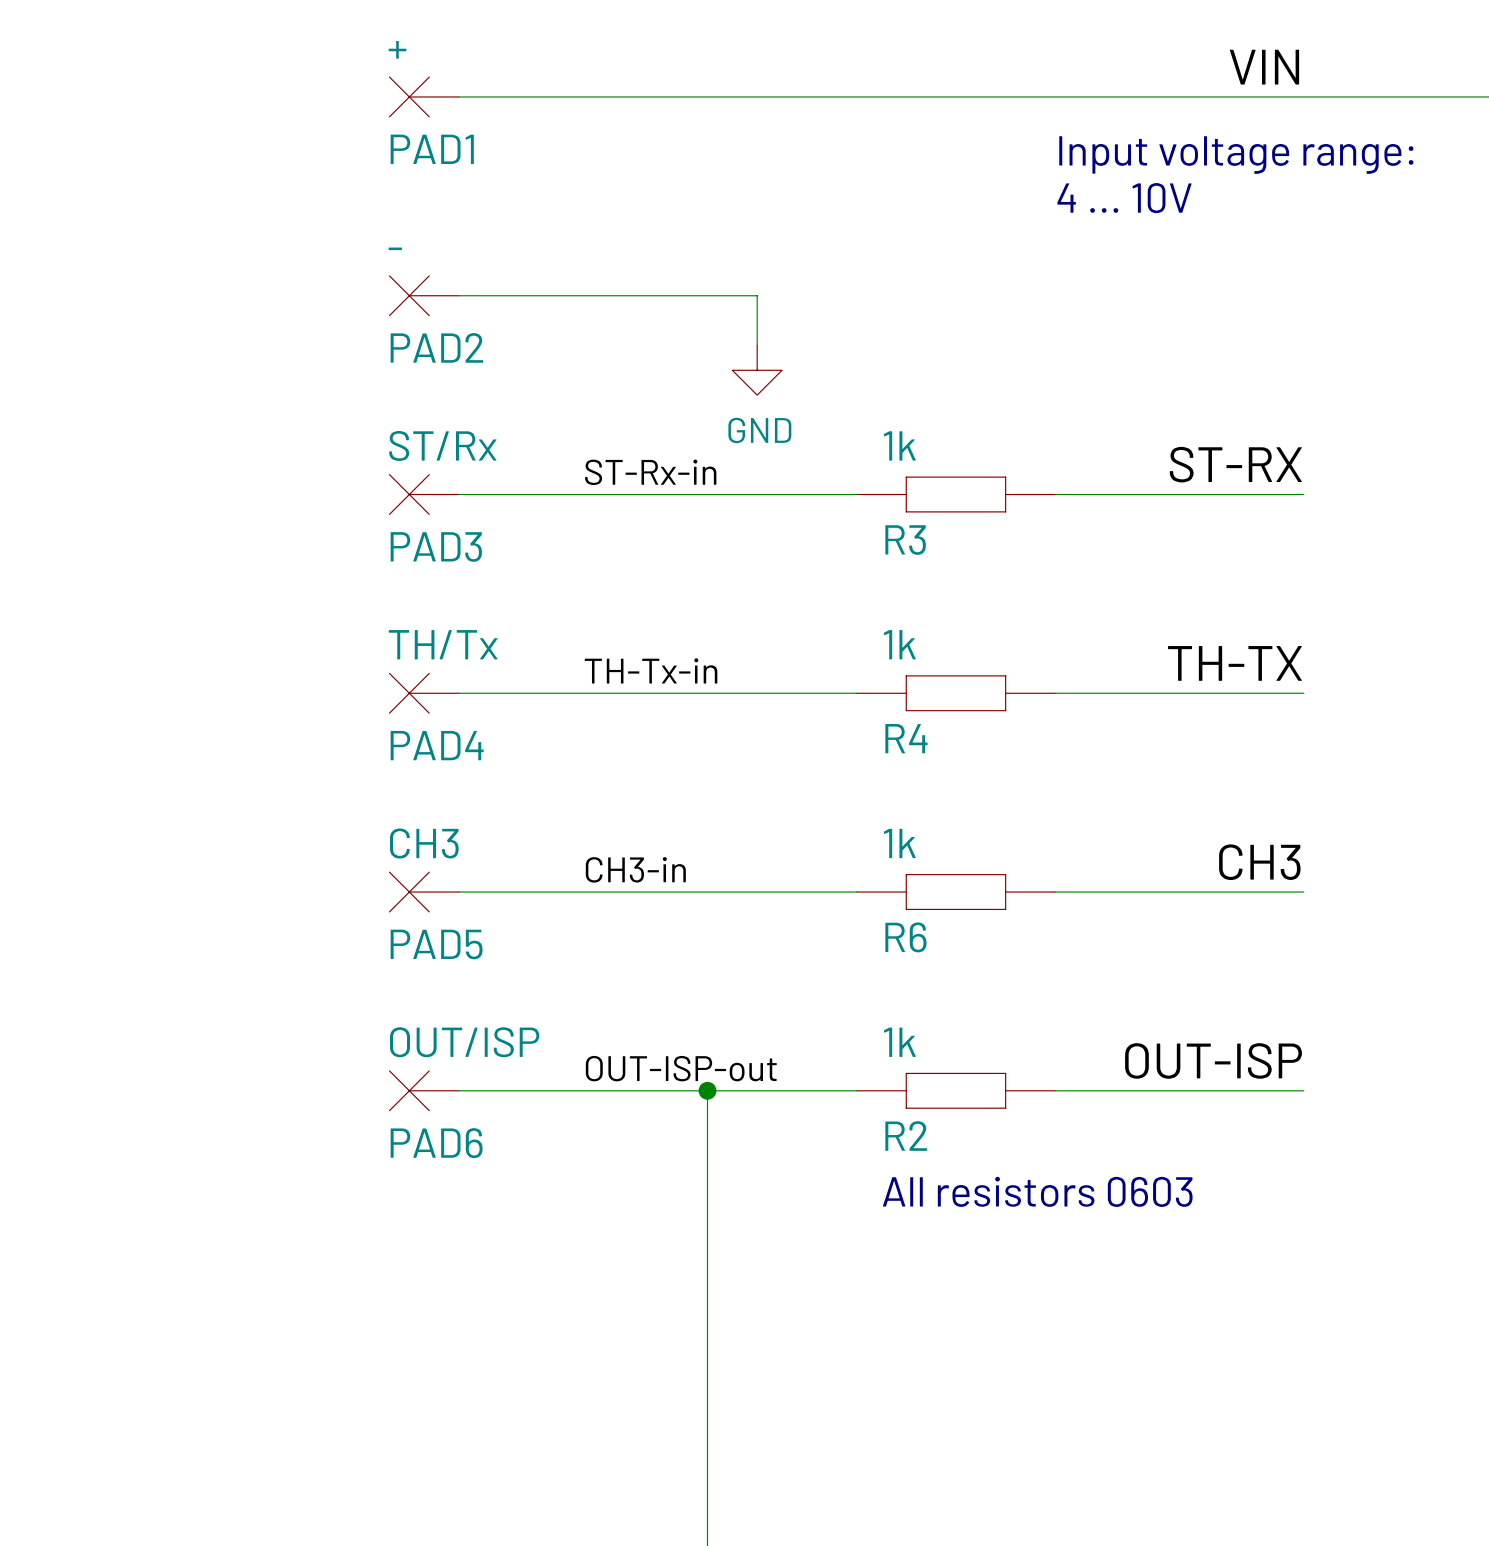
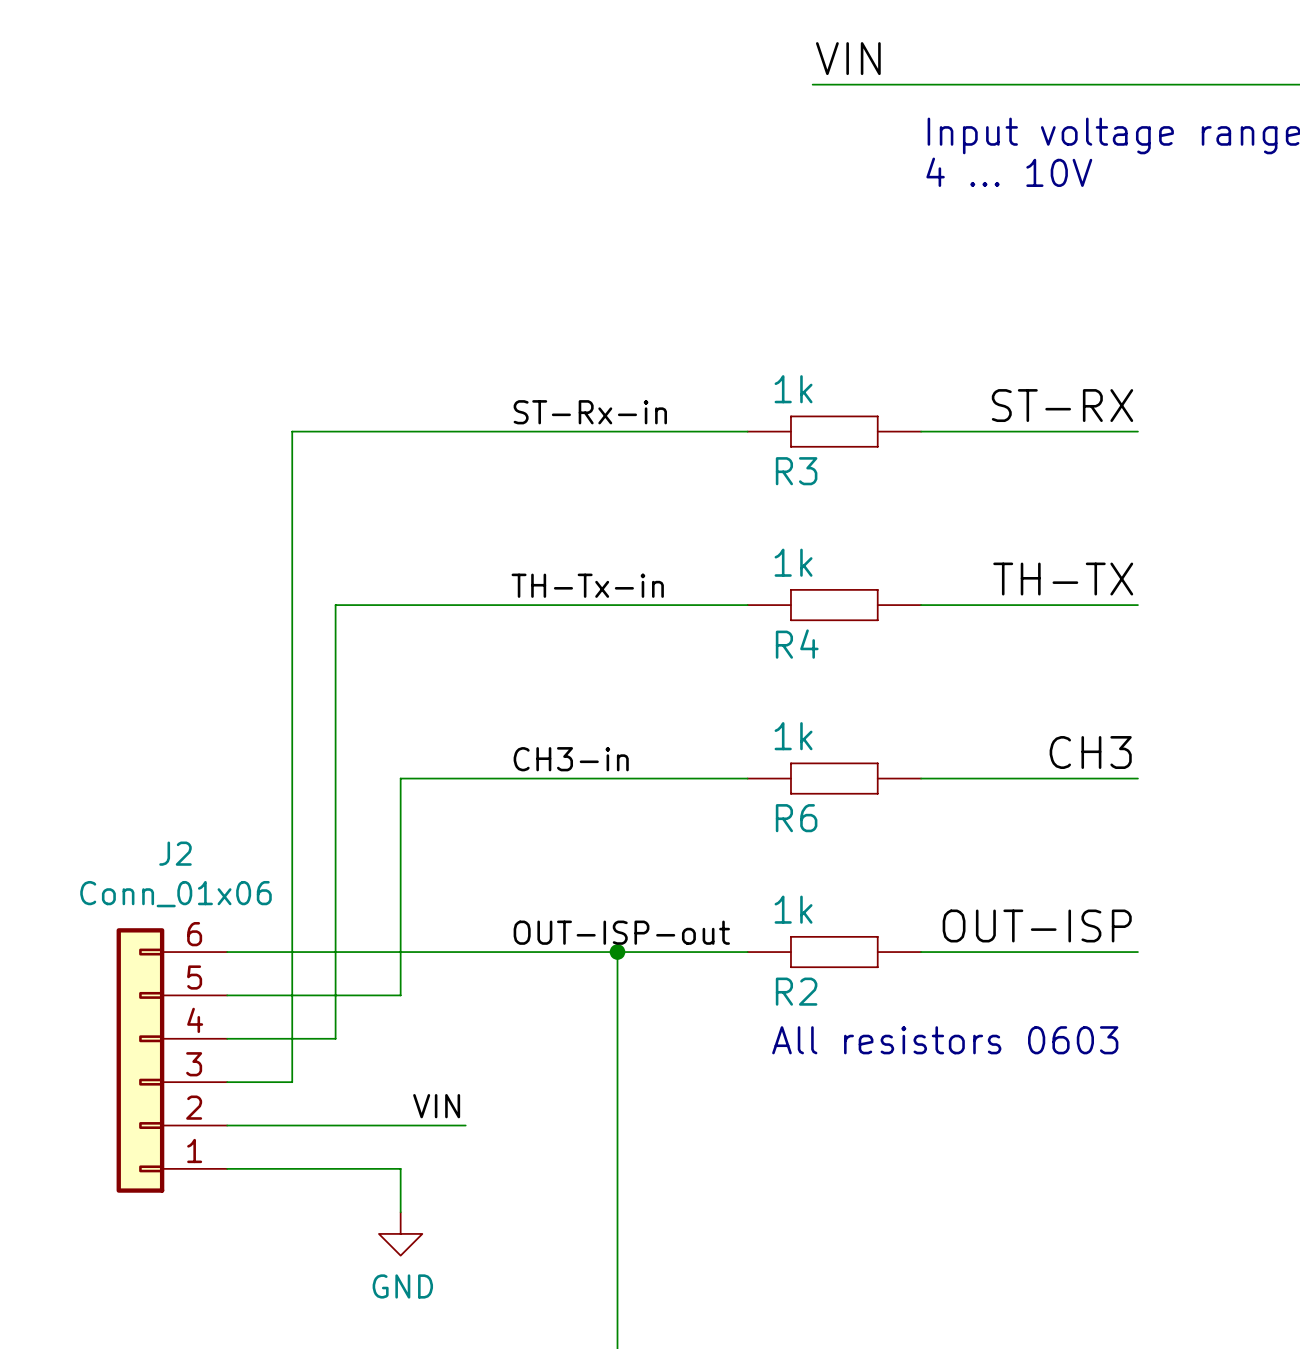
label position: VIN (1264, 67) -> VIN (848, 58)
PAD1: + (424, 96) -> none
wire: (459, 96) (931, 96) -> none
PAD2: - (424, 295) -> none
wire: (459, 295) (757, 295) (757, 345) -> none
power symbol: GND (757, 370) -> none
PAD3: ST/Rx (424, 494) -> none
wire: none -> (400, 431) (292, 431) (292, 1082) (227, 1082)
PAD4: TH/Tx (424, 693) -> none
wire: none -> (400, 605) (335, 605) (335, 1038) (227, 1038)
PAD5: CH3 (424, 892) -> none
wire: none -> (400, 778) (400, 995) (227, 995)
wire: none -> (227, 952) (400, 952)
PAD6: OUT/ISP (424, 1090) -> none
J2: none -> Conn_01x06 (171, 1060)
label: none -> VIN (436, 1106)
wire: none -> (227, 1125) (465, 1125)
wire: none -> (227, 1168) (400, 1168) (400, 1212)
power symbol: none -> GND (400, 1233)

